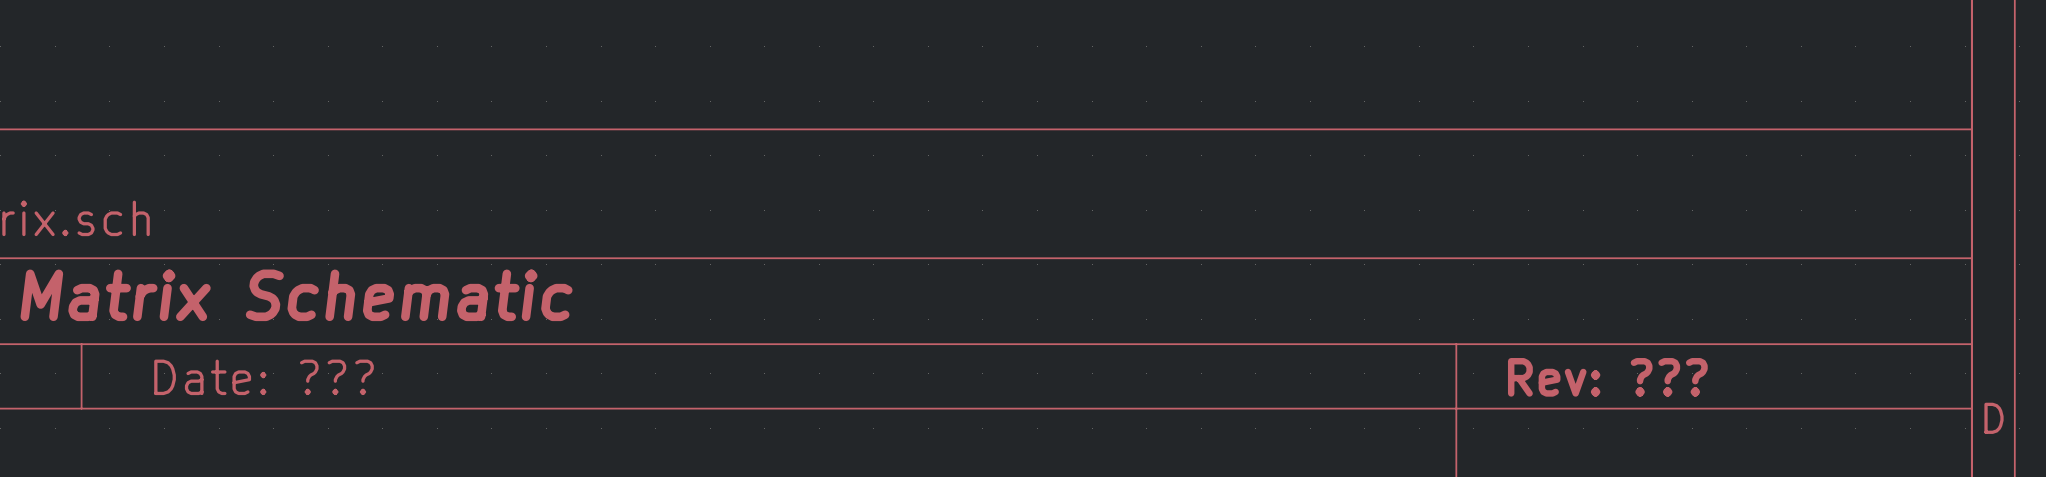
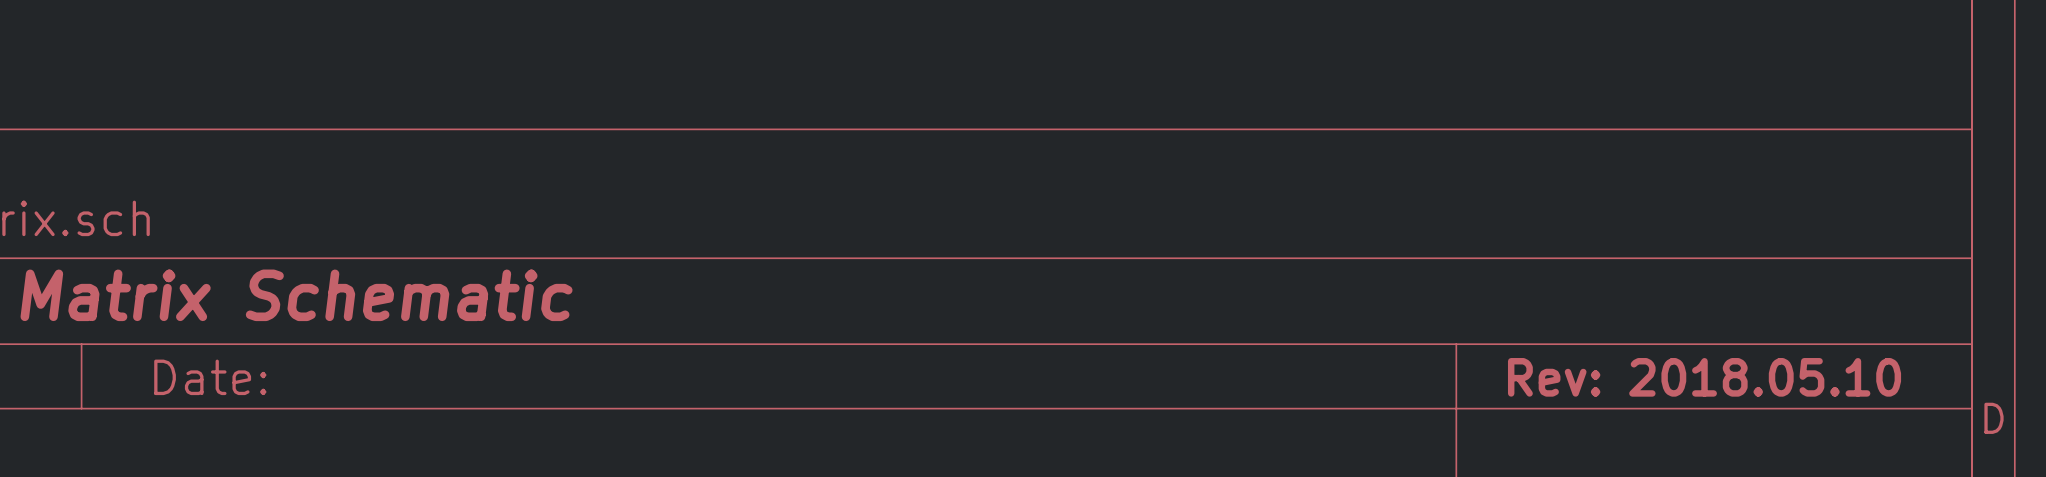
title block: Date: ??? (264, 377) -> Date: (210, 377)
title block: Rev: ??? (1607, 377) -> Rev: 2018.05.10 (1704, 377)

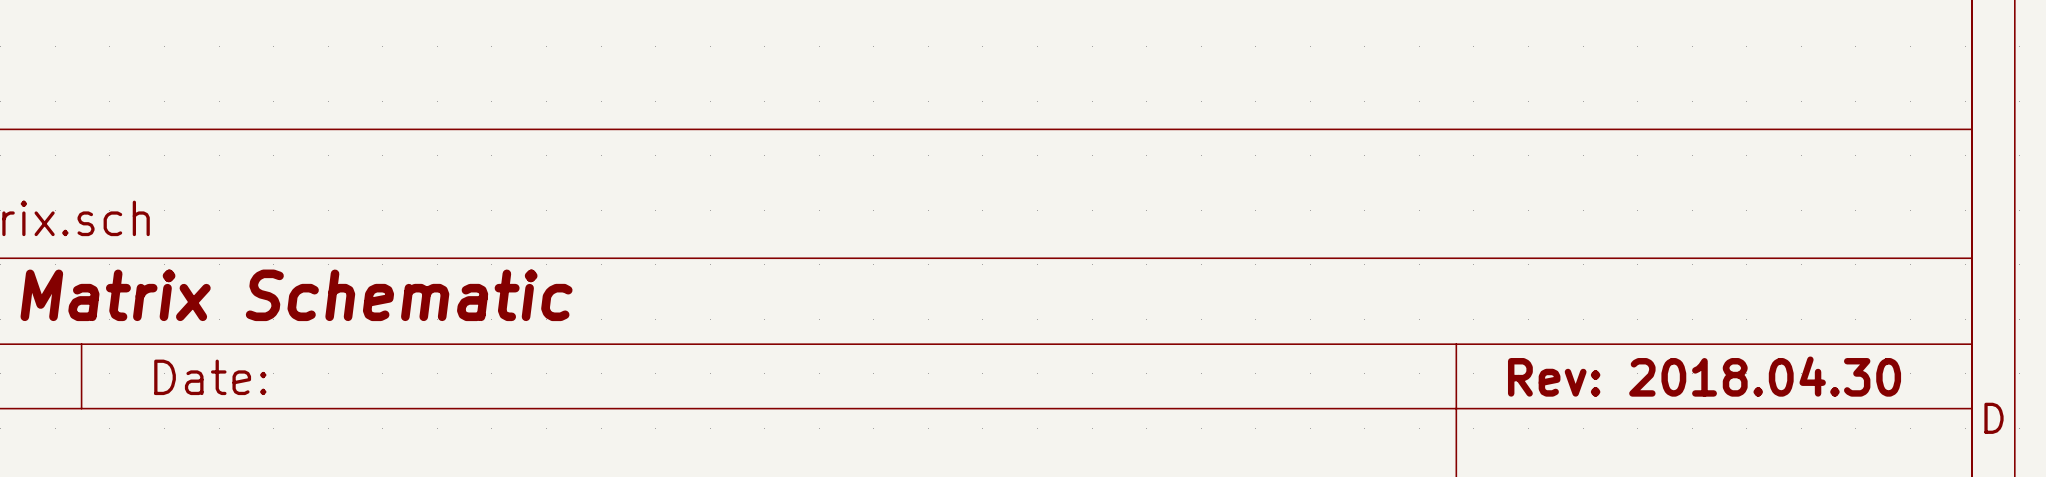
title block: Rev: 2018.05.10 (1704, 377) -> Rev: 2018.04.30 (1704, 376)

